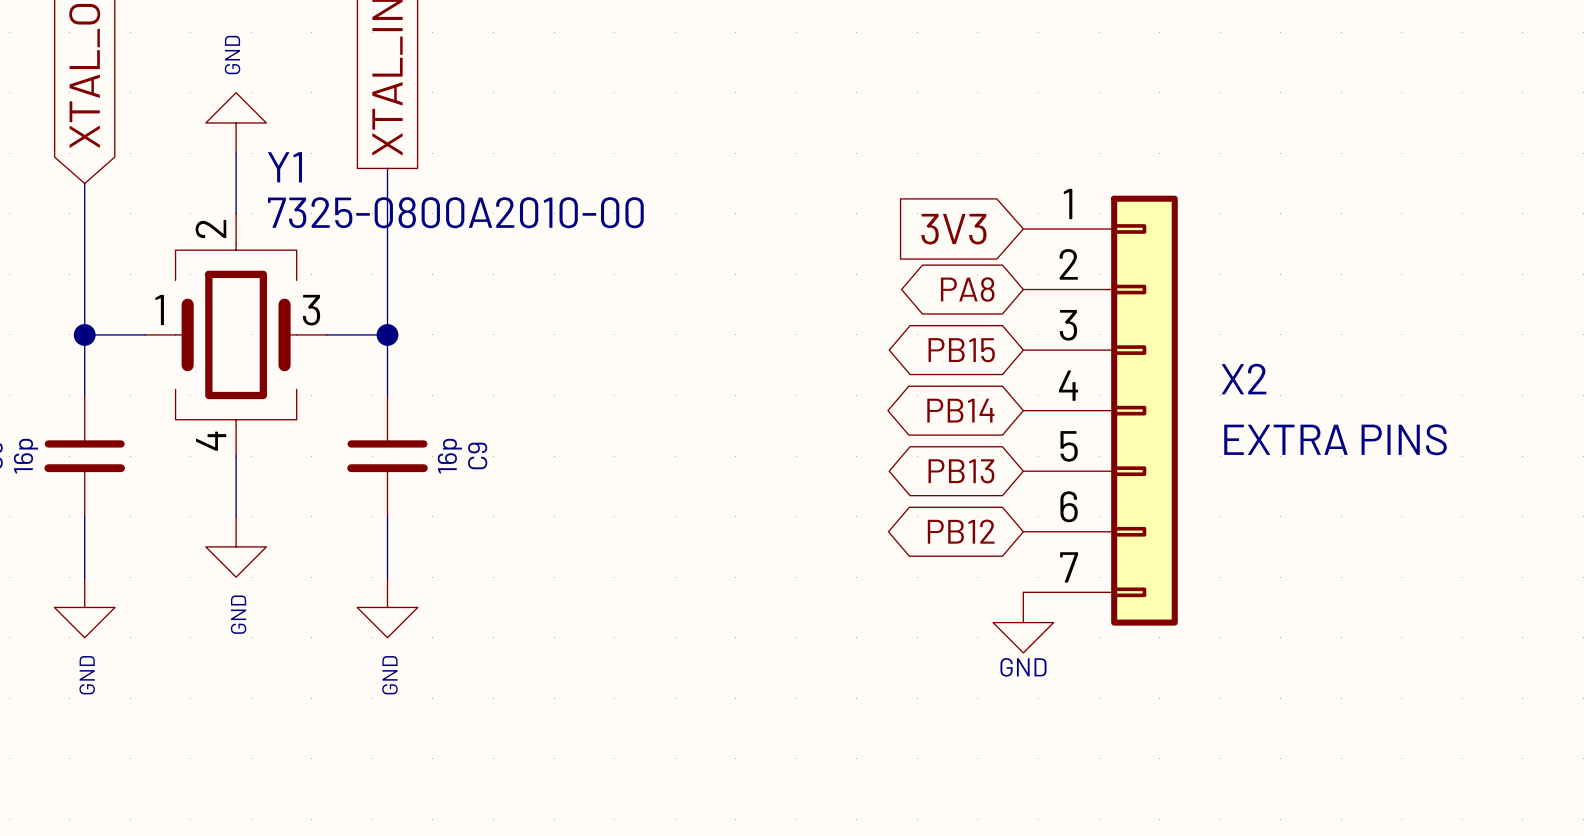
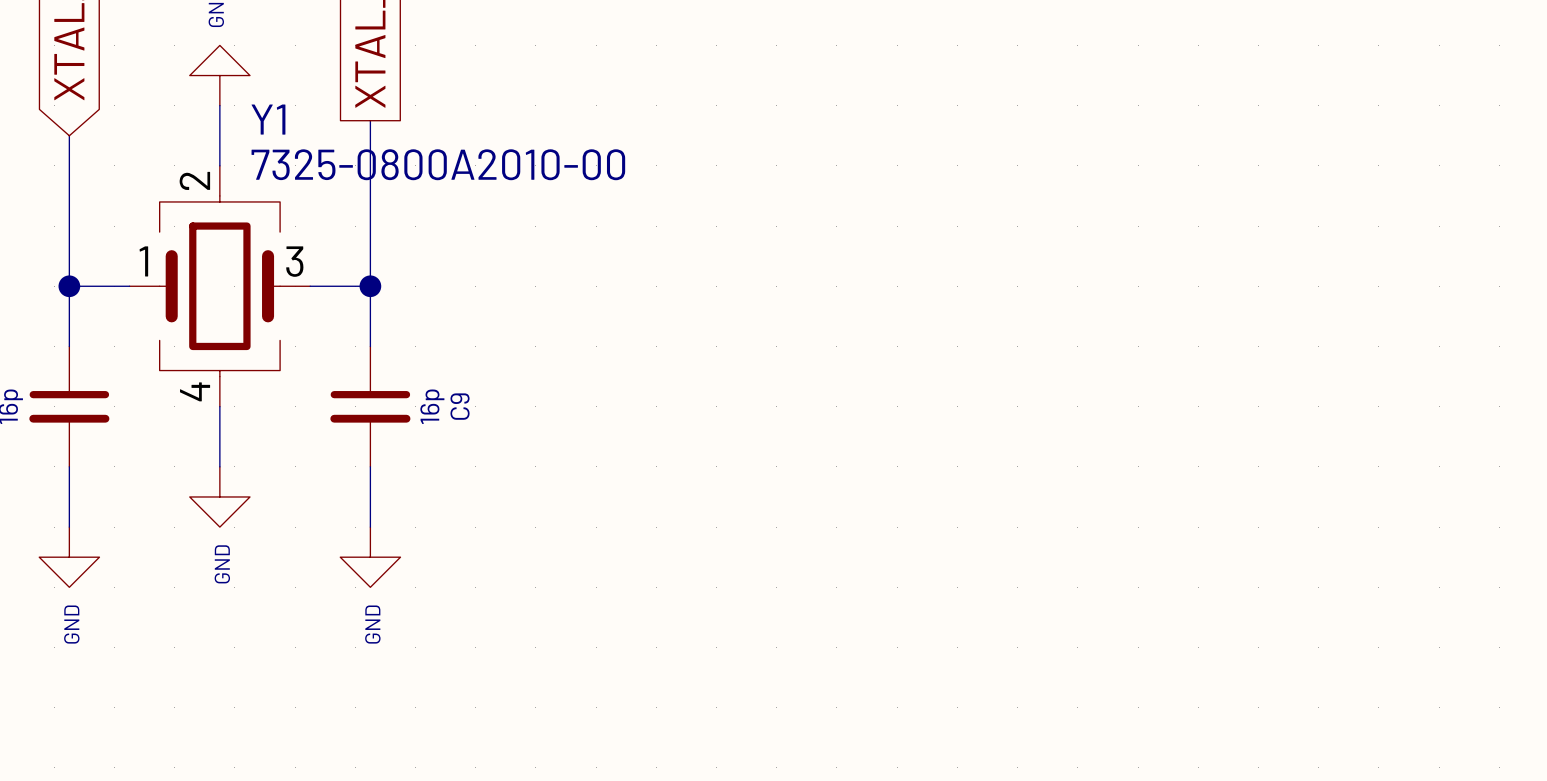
global label: 3V3 (953, 229) -> none
global label: PA8 (967, 289) -> none
global label: PB15 (961, 350) -> none
global label: PB14 (960, 410) -> none
X2: EXTRA PINS (1100, 410) -> none
global label: PB13 (961, 471) -> none
global label: PB12 (961, 531) -> none
power symbol: GND (1023, 622) -> none

